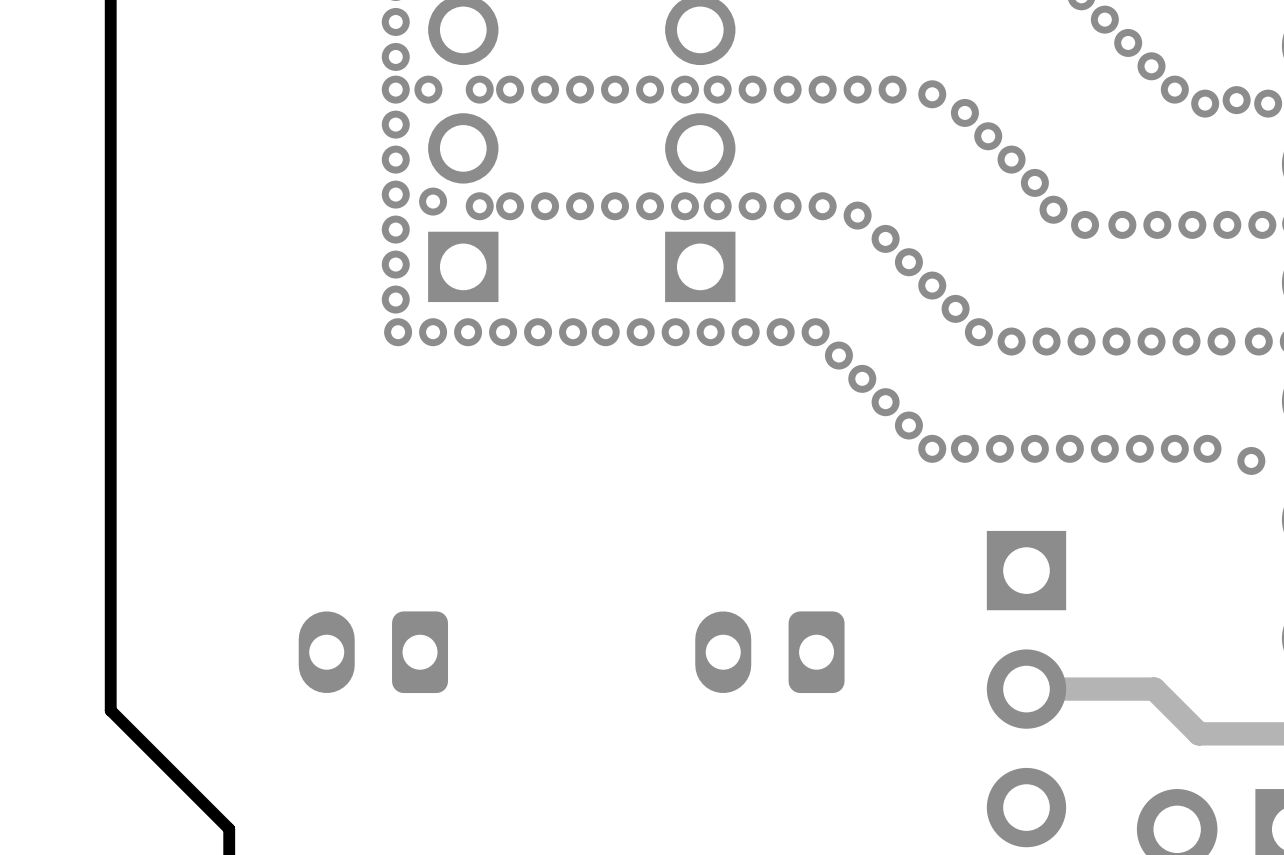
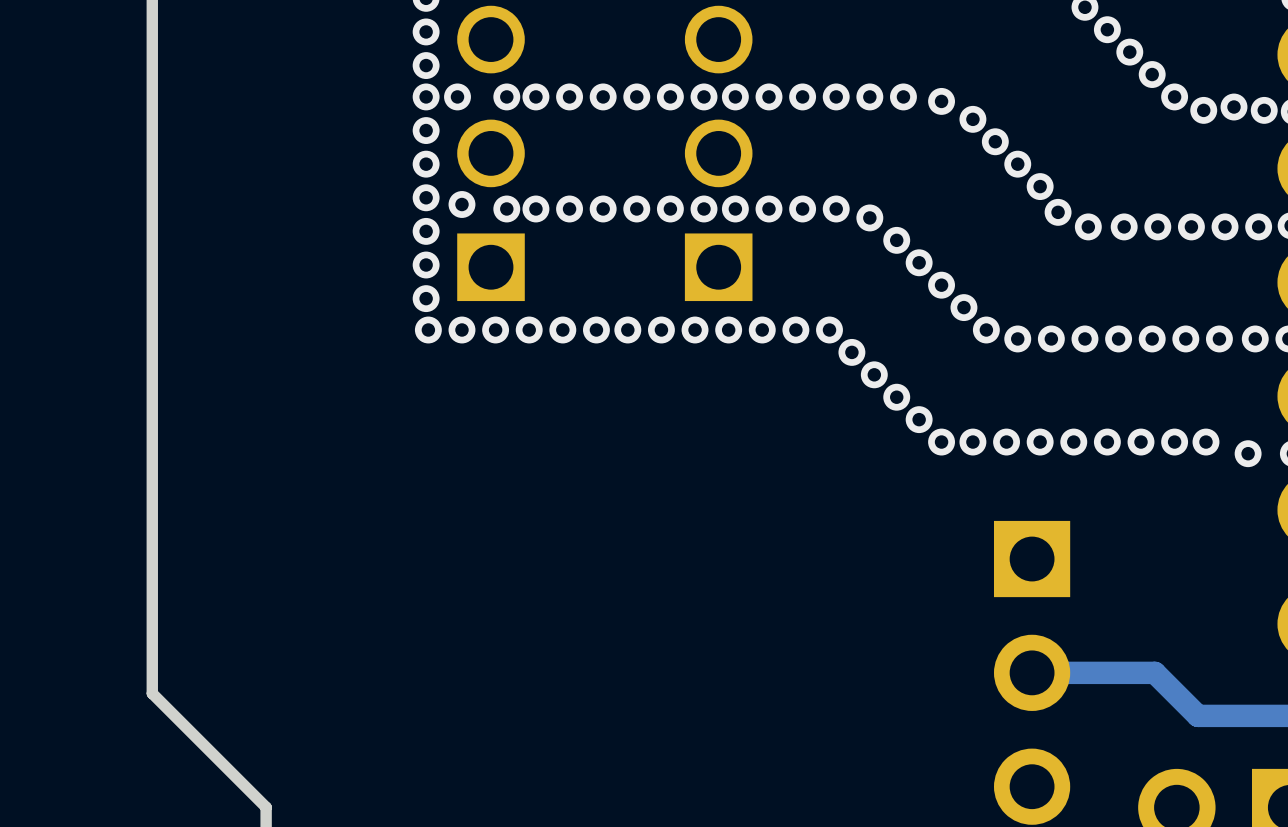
part: (373, 652) -> none
part: (769, 652) -> none

